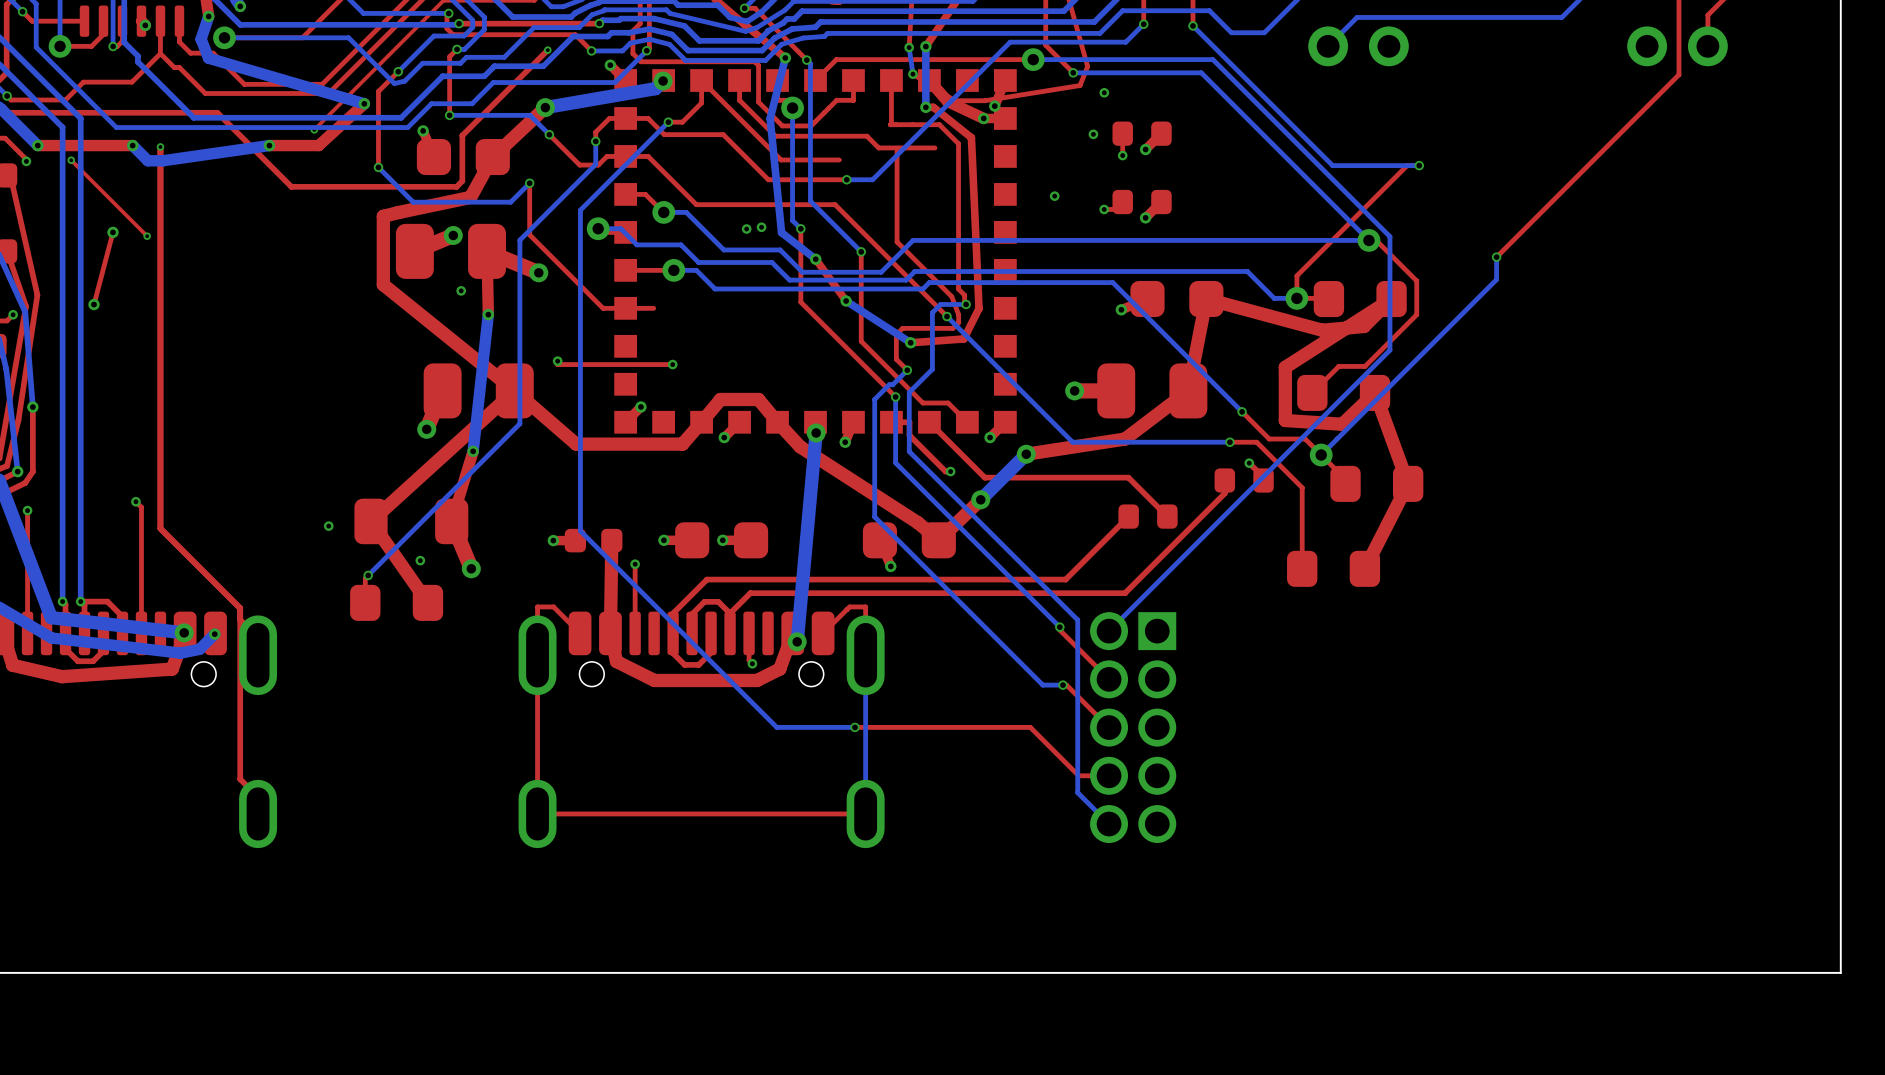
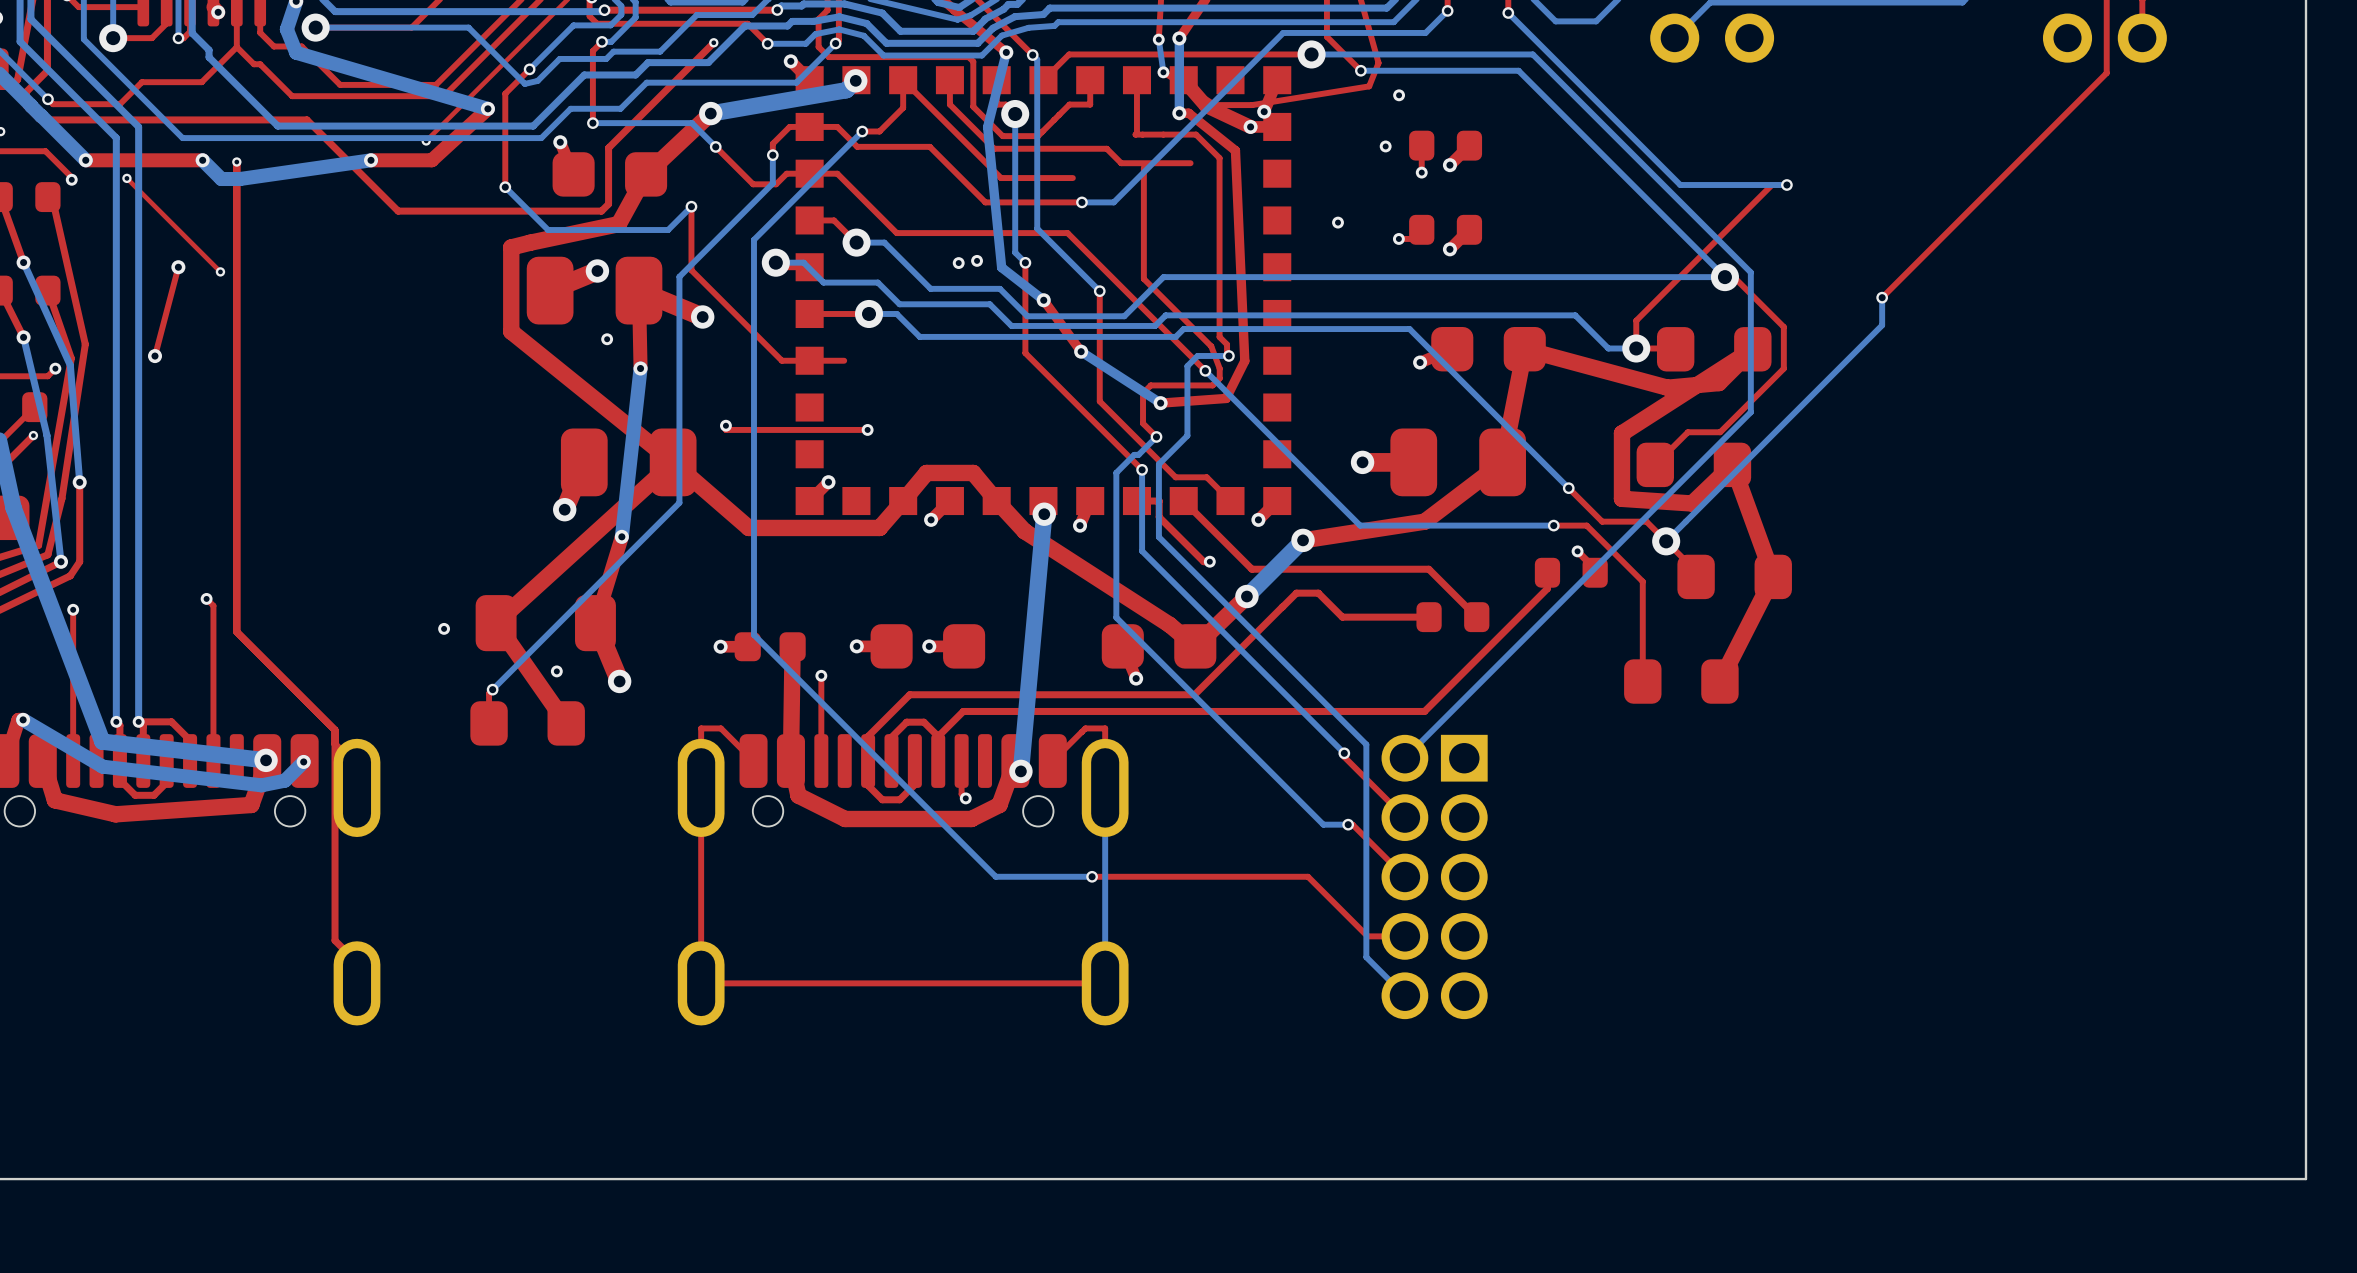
top track: (1128, 516) (1065, 579) (938, 579) -> (1429, 617) (1342, 617) (1318, 593) (1296, 593) (1194, 694)

